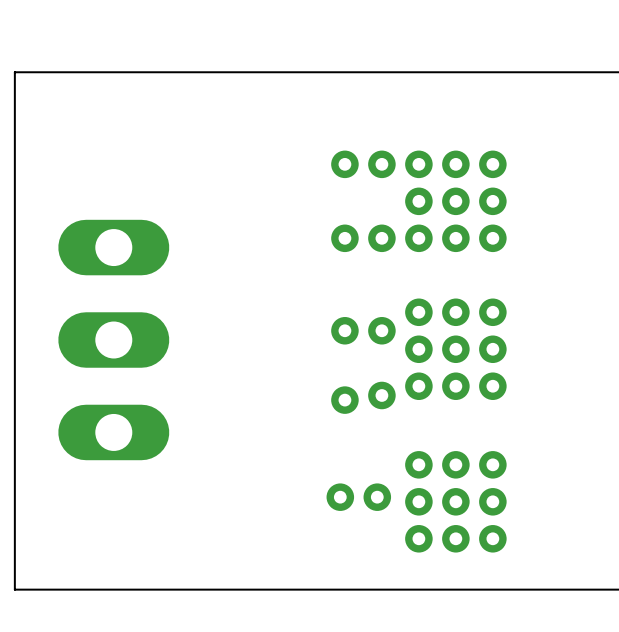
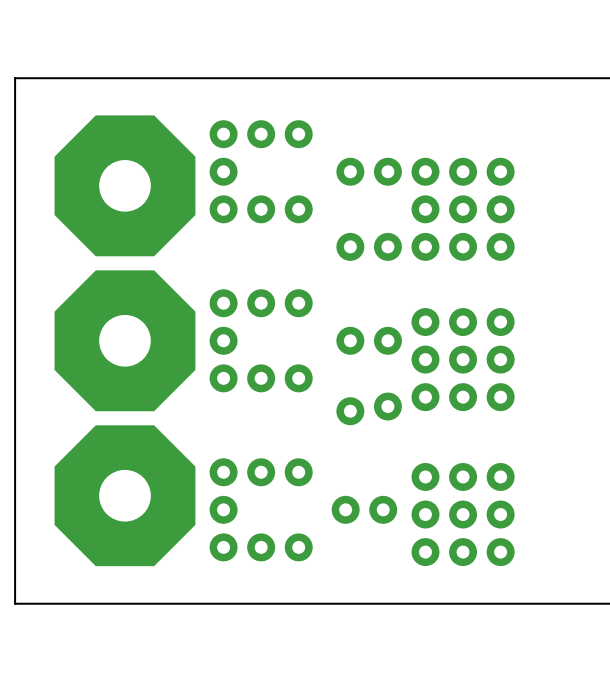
via: none -> (223, 134)
via: none -> (261, 134)
via: none -> (298, 134)
via: none -> (223, 171)
part: none -> (124, 185)
via: none -> (223, 209)
via: none -> (261, 209)
via: none -> (298, 209)
part footprint: [58, 219, 170, 461] -> [54, 270, 196, 412]
via: none -> (223, 303)
via: none -> (261, 303)
via: none -> (298, 303)
via: none -> (223, 340)
via: none -> (223, 378)
via: none -> (261, 378)
via: none -> (298, 378)
via: none -> (223, 472)
via: none -> (261, 472)
via: none -> (298, 472)
part: none -> (124, 495)
via: none -> (223, 509)
via: none -> (223, 547)
via: none -> (261, 547)
via: none -> (298, 547)

